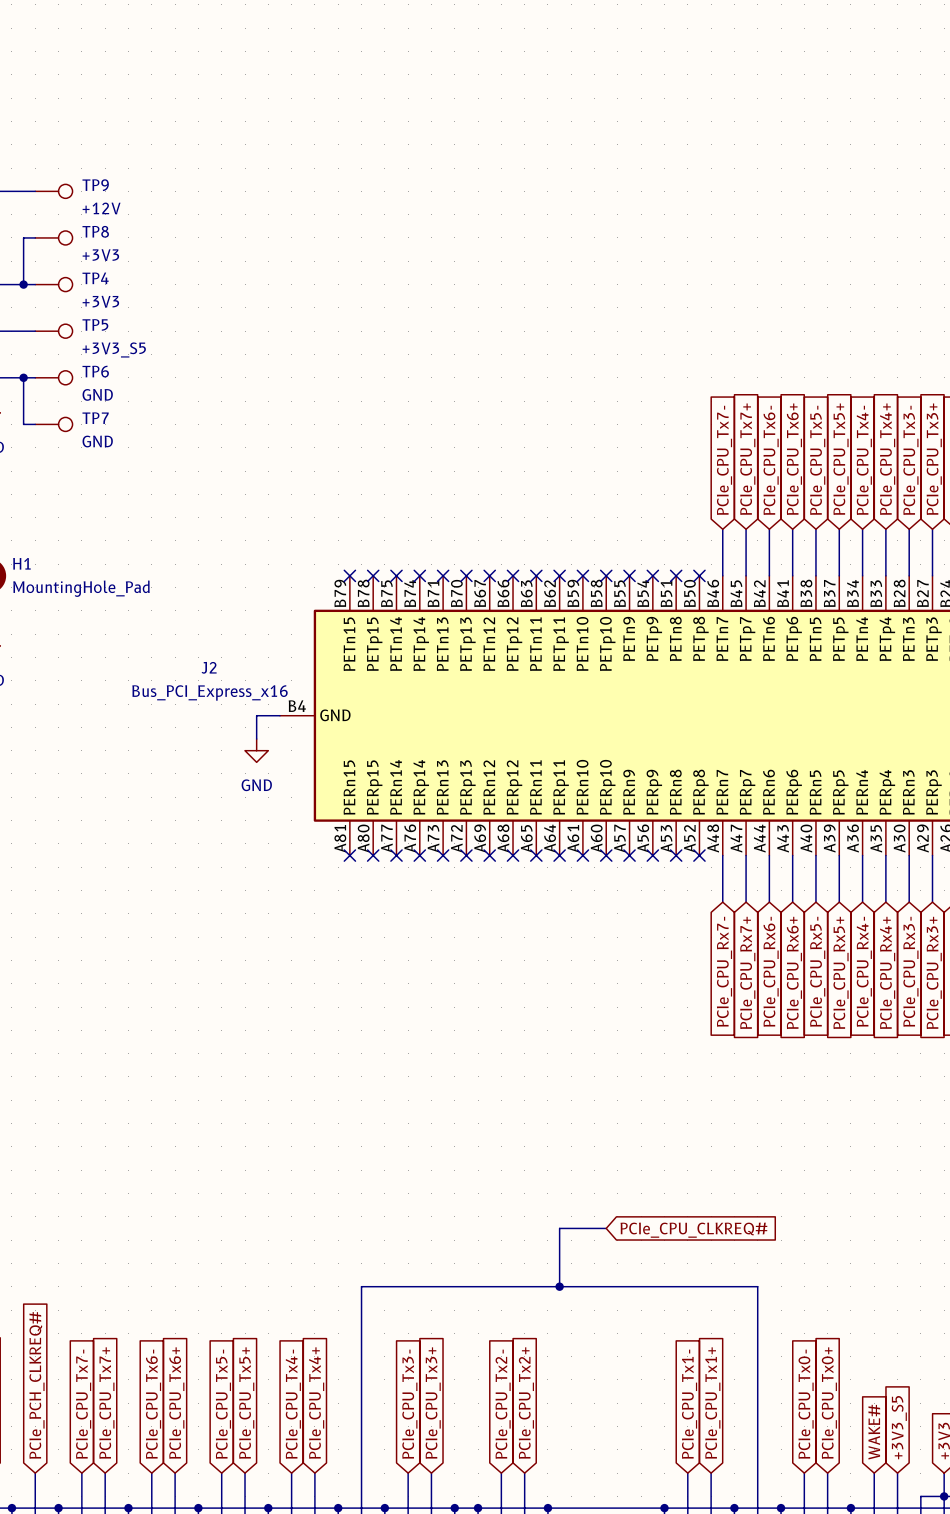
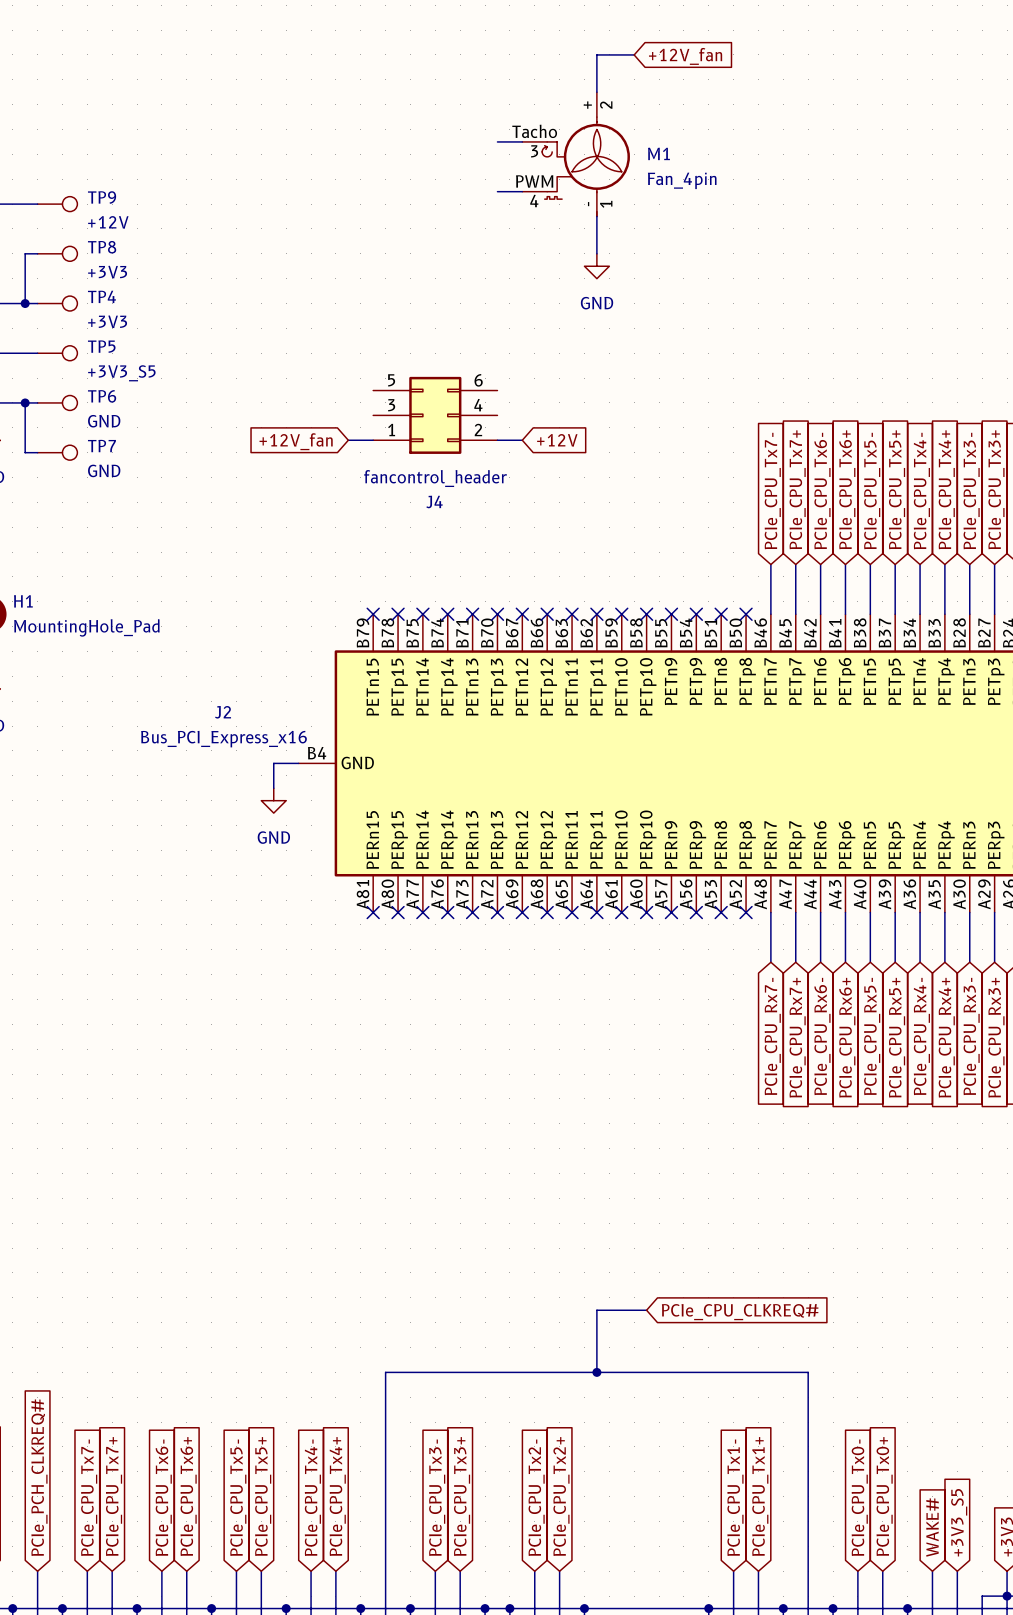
wire: none -> (634, 54) (596, 54) (596, 92)
global label: none -> +12V_fan (685, 56)
wire: none -> (497, 141) (522, 141)
M1: none -> Fan_4pin (576, 154)
wire: none -> (497, 191) (522, 191)
wire: none -> (596, 216) (596, 253)
power symbol: none -> GND (596, 266)
J4: none -> fancontrol_header (435, 415)
wire: none -> (348, 440) (373, 440)
wire: none -> (497, 440) (522, 440)
global label: none -> +12V (557, 440)
global label: none -> +12V_fan (296, 441)

